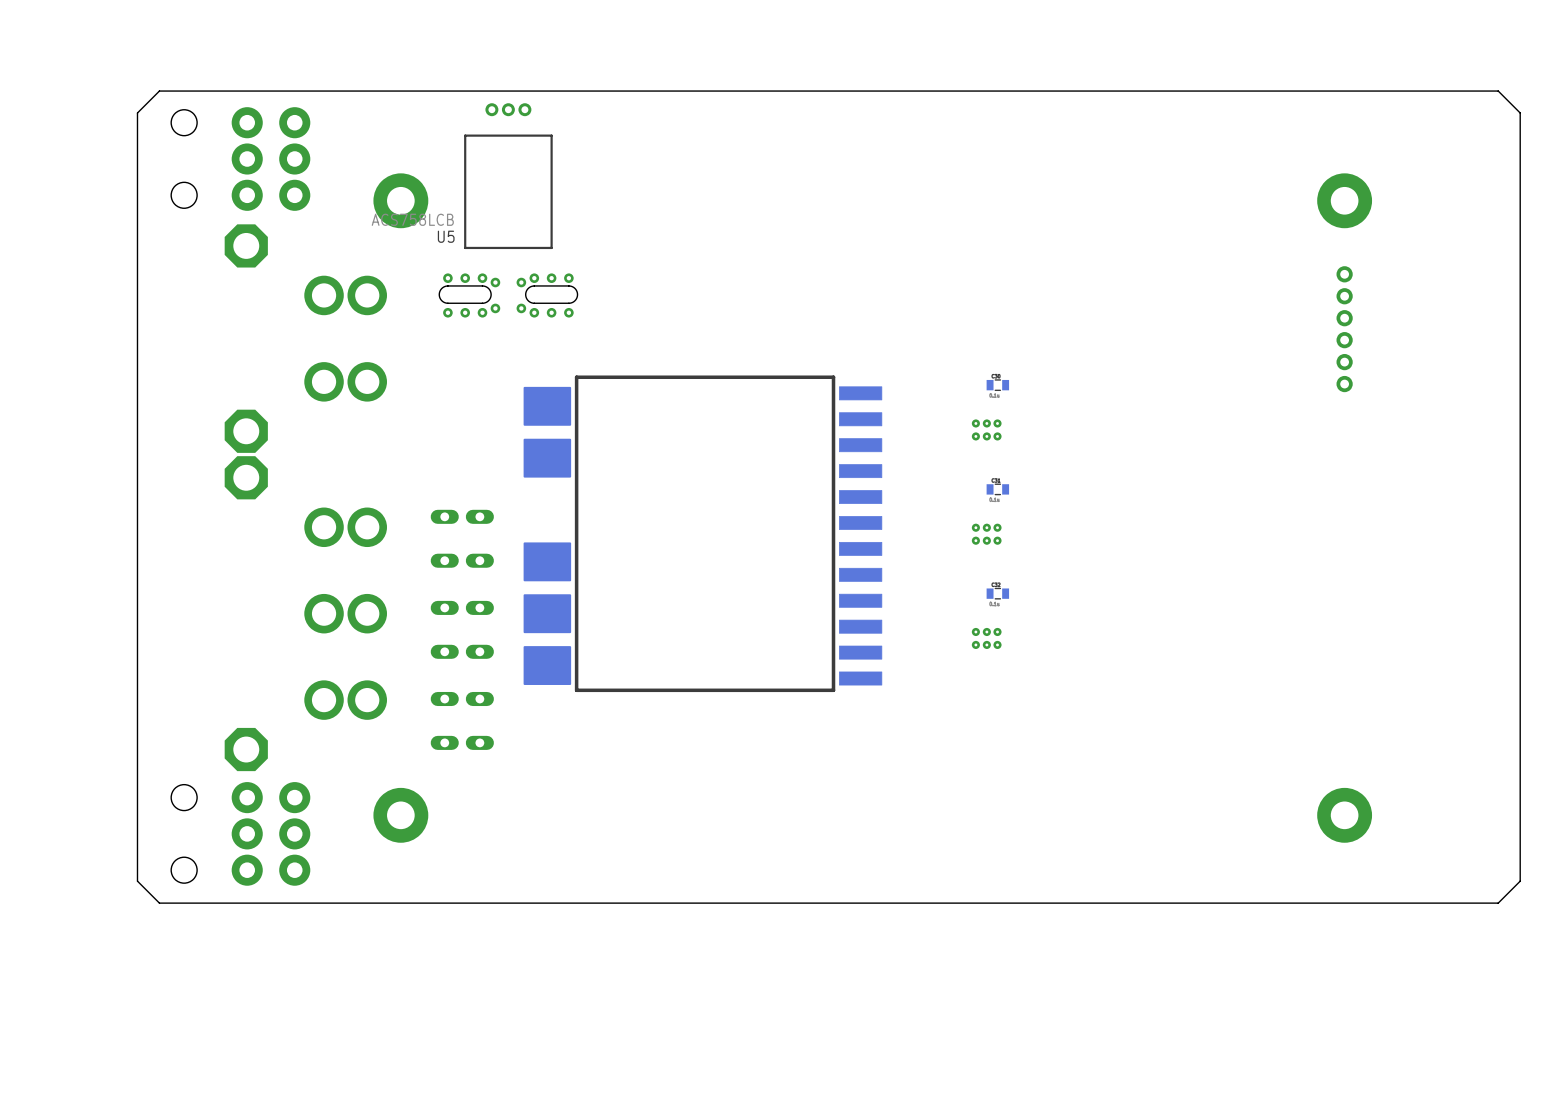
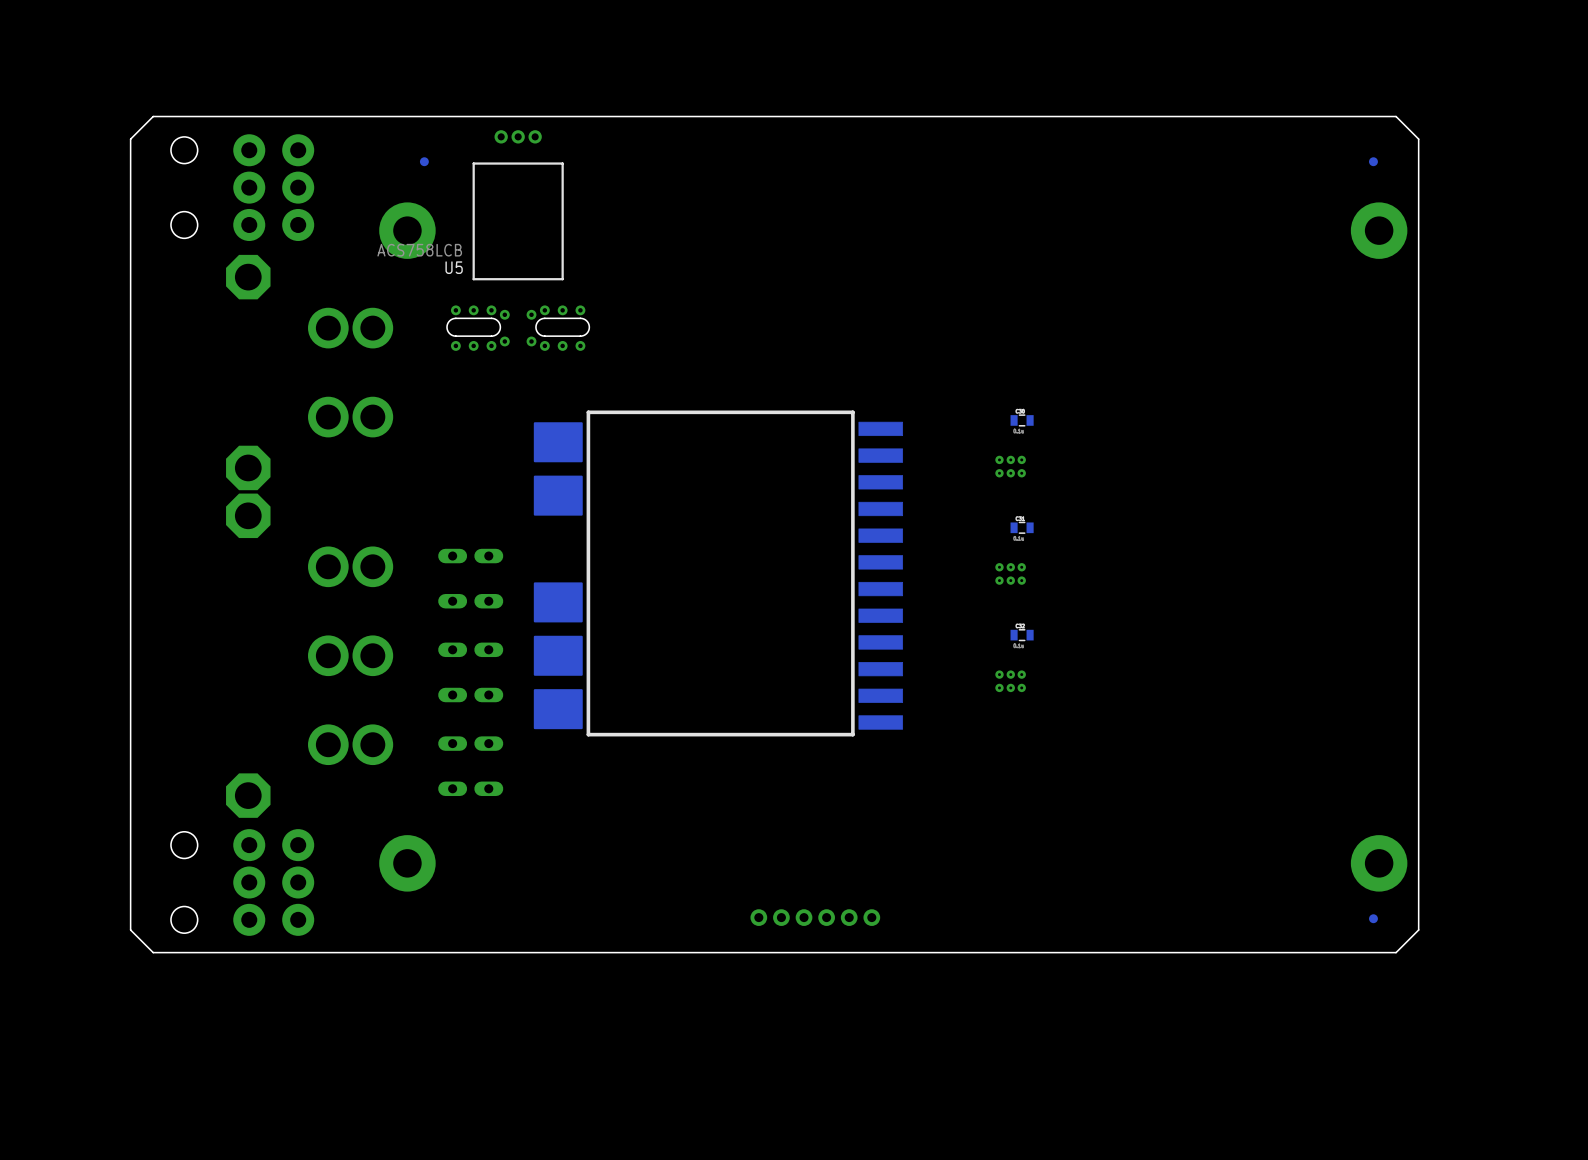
board edge: (1498, 91) (159, 91) (137, 112) (137, 881) (159, 903) (1498, 903) (1520, 881) (1520, 112) (1498, 91) -> (1396, 116) (1418, 139) (1418, 930) (1396, 952) (153, 952) (130, 930) (130, 139) (153, 116) (1396, 116)
part: none -> (424, 161)
part: none -> (1373, 161)
part: (1344, 329) -> none
part: none -> (815, 917)
part: none -> (1373, 918)

